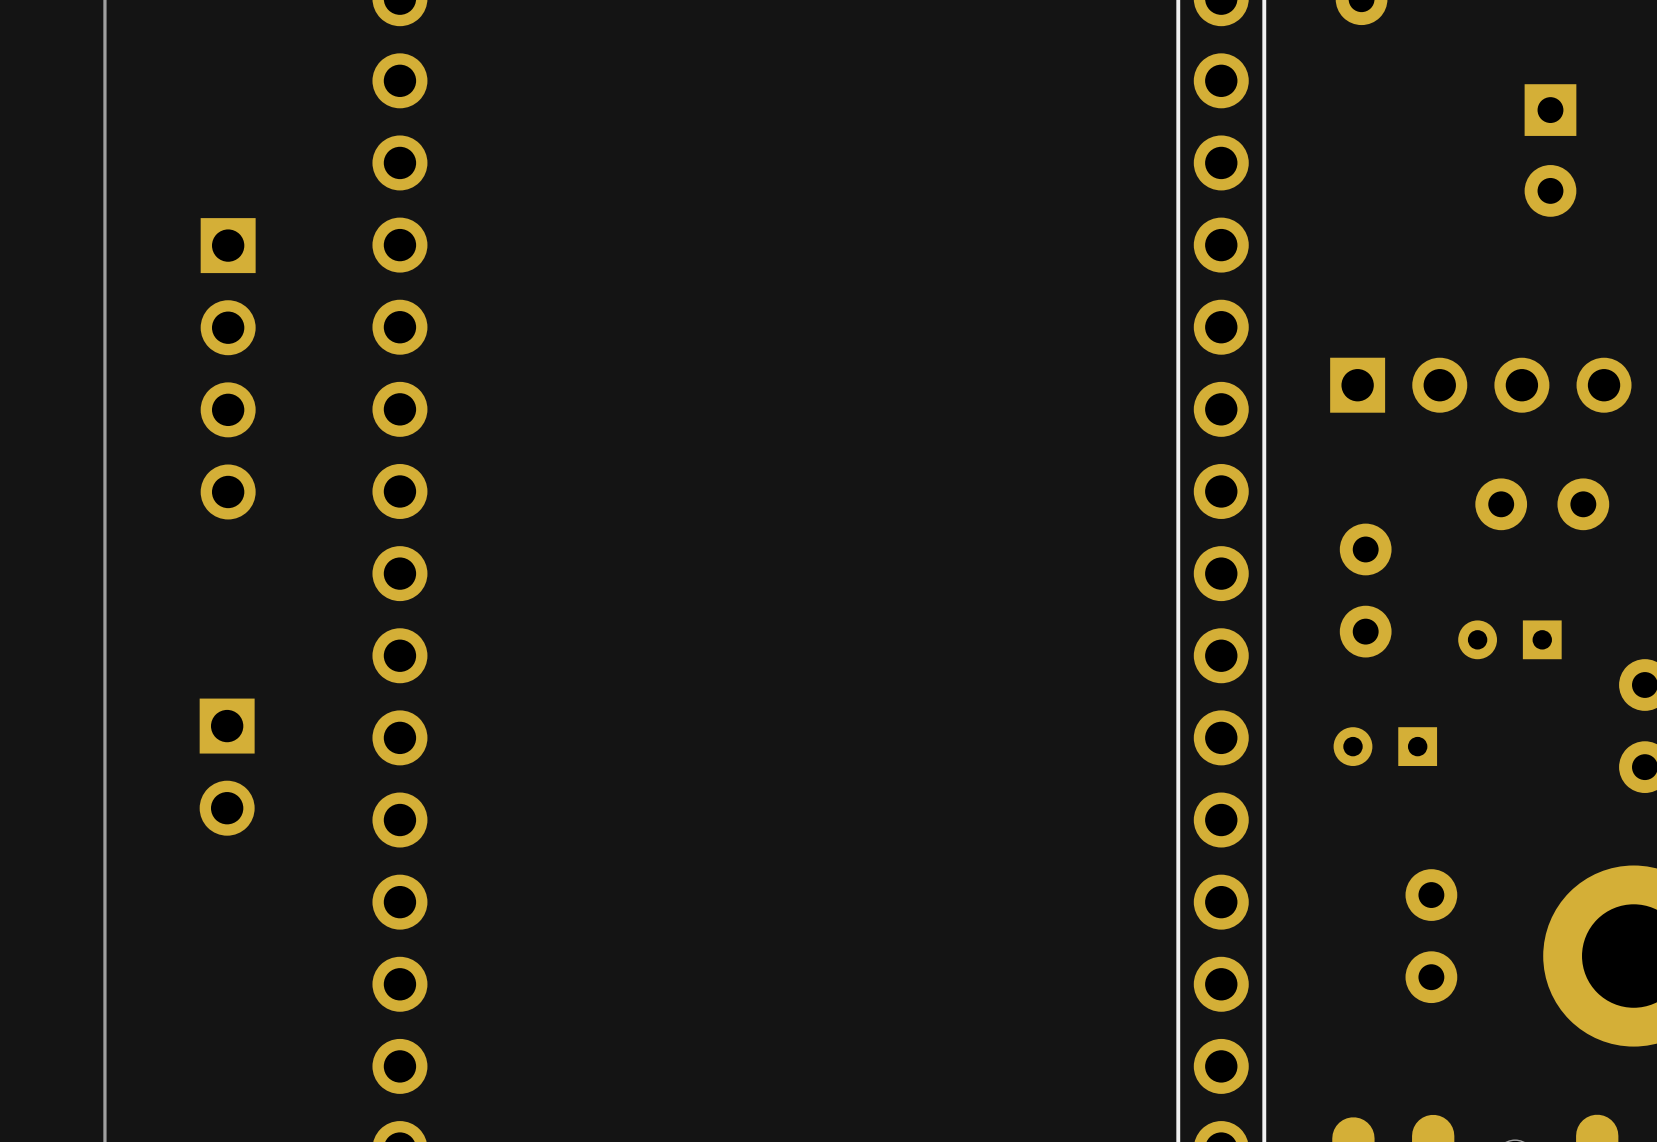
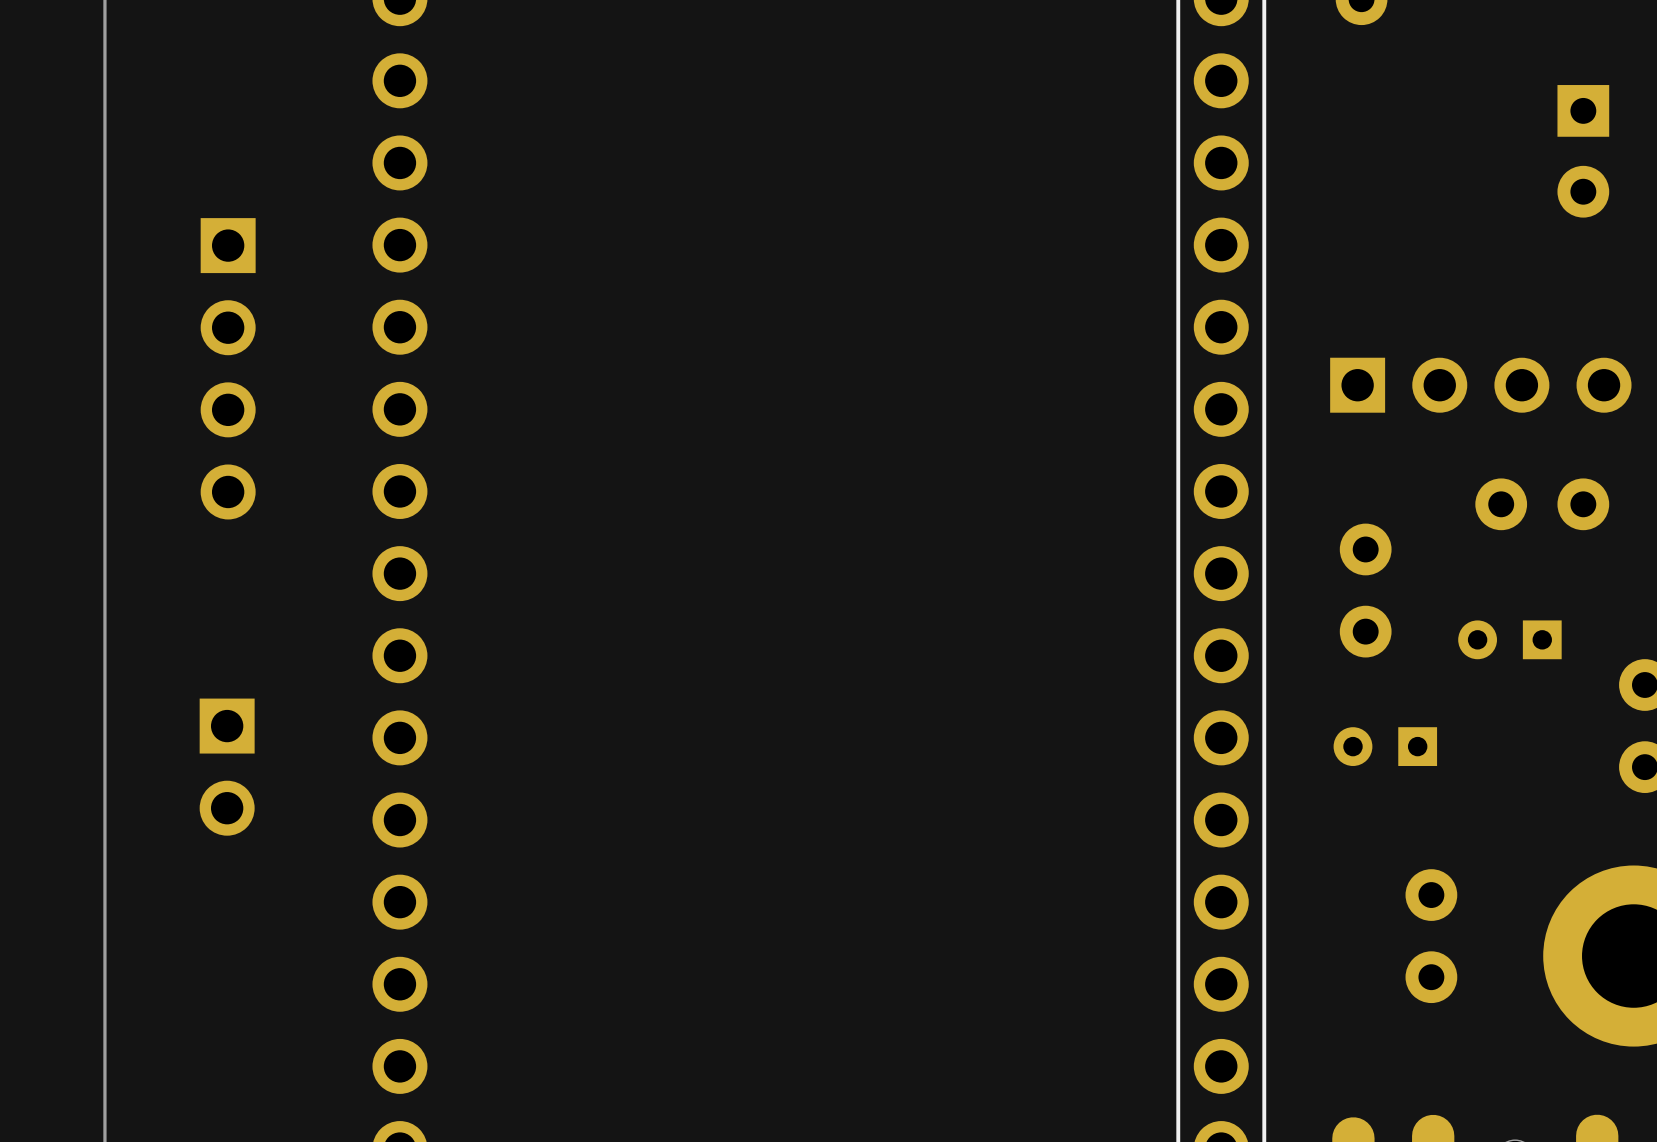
part position: (1550, 150) -> (1583, 151)

